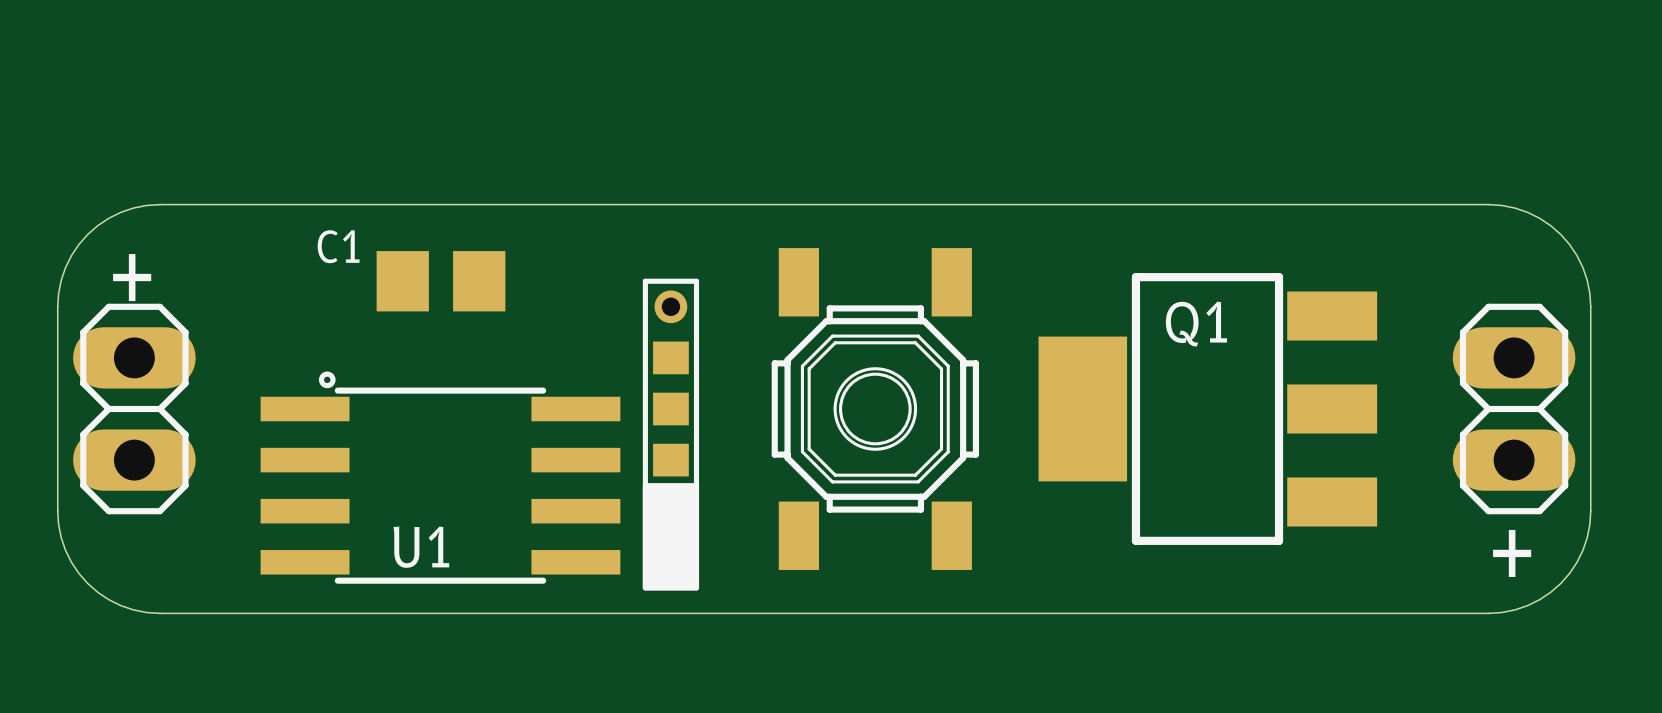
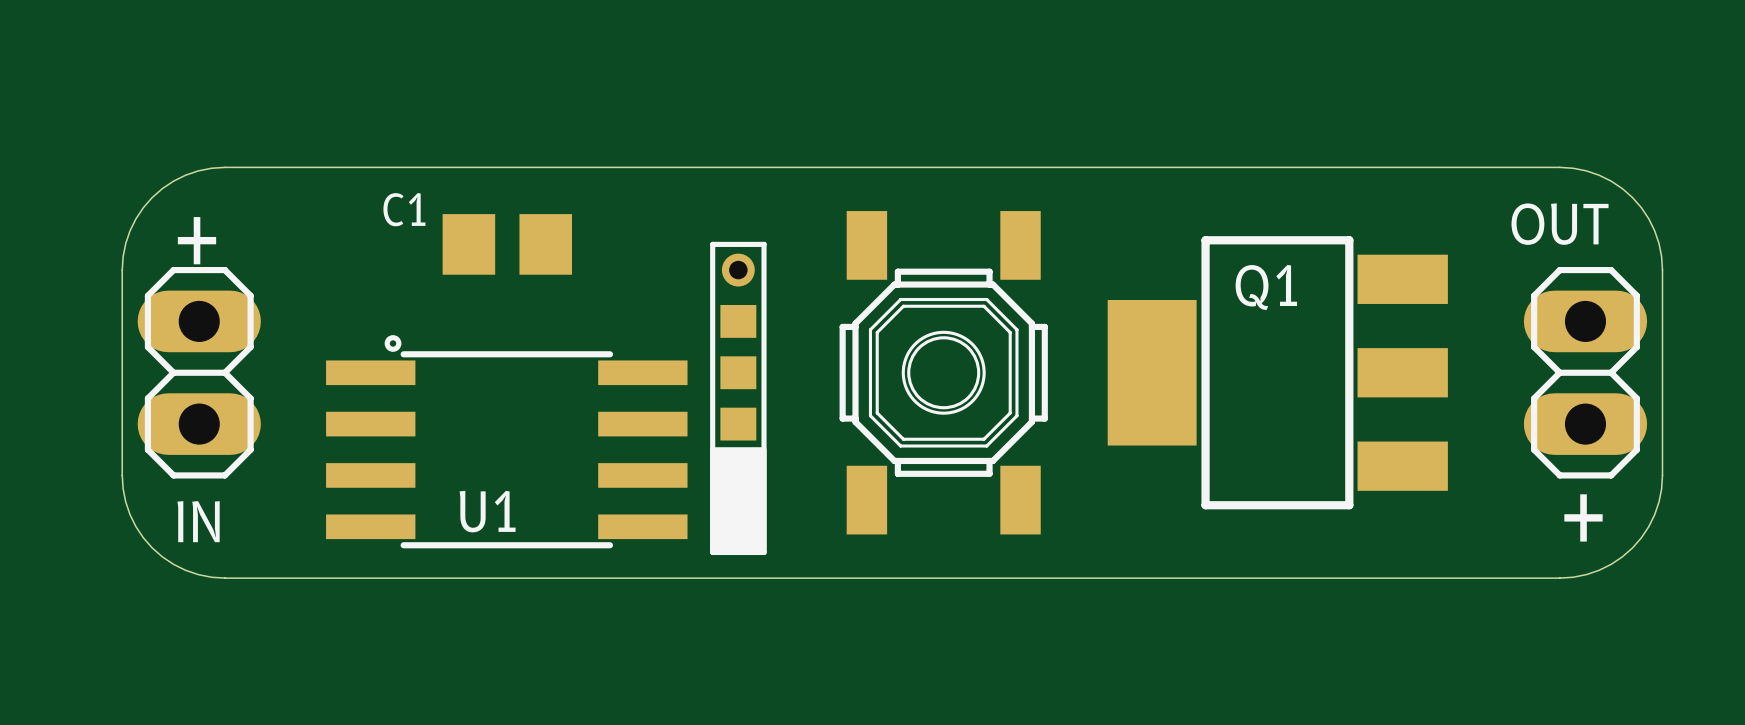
text: none -> OUT (1560, 224)
text: none -> IN (198, 521)

